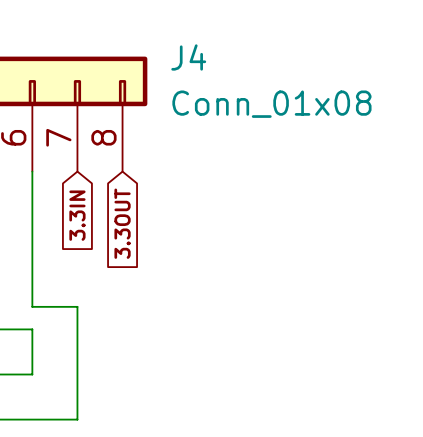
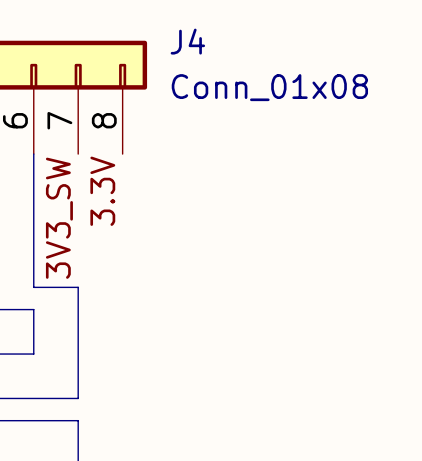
label: none -> 3.3V (102, 191)
global label: 3.3IN (77, 215) -> none
global label: 3.3OUT (122, 223) -> none
label: none -> 3V3_SW (59, 218)

